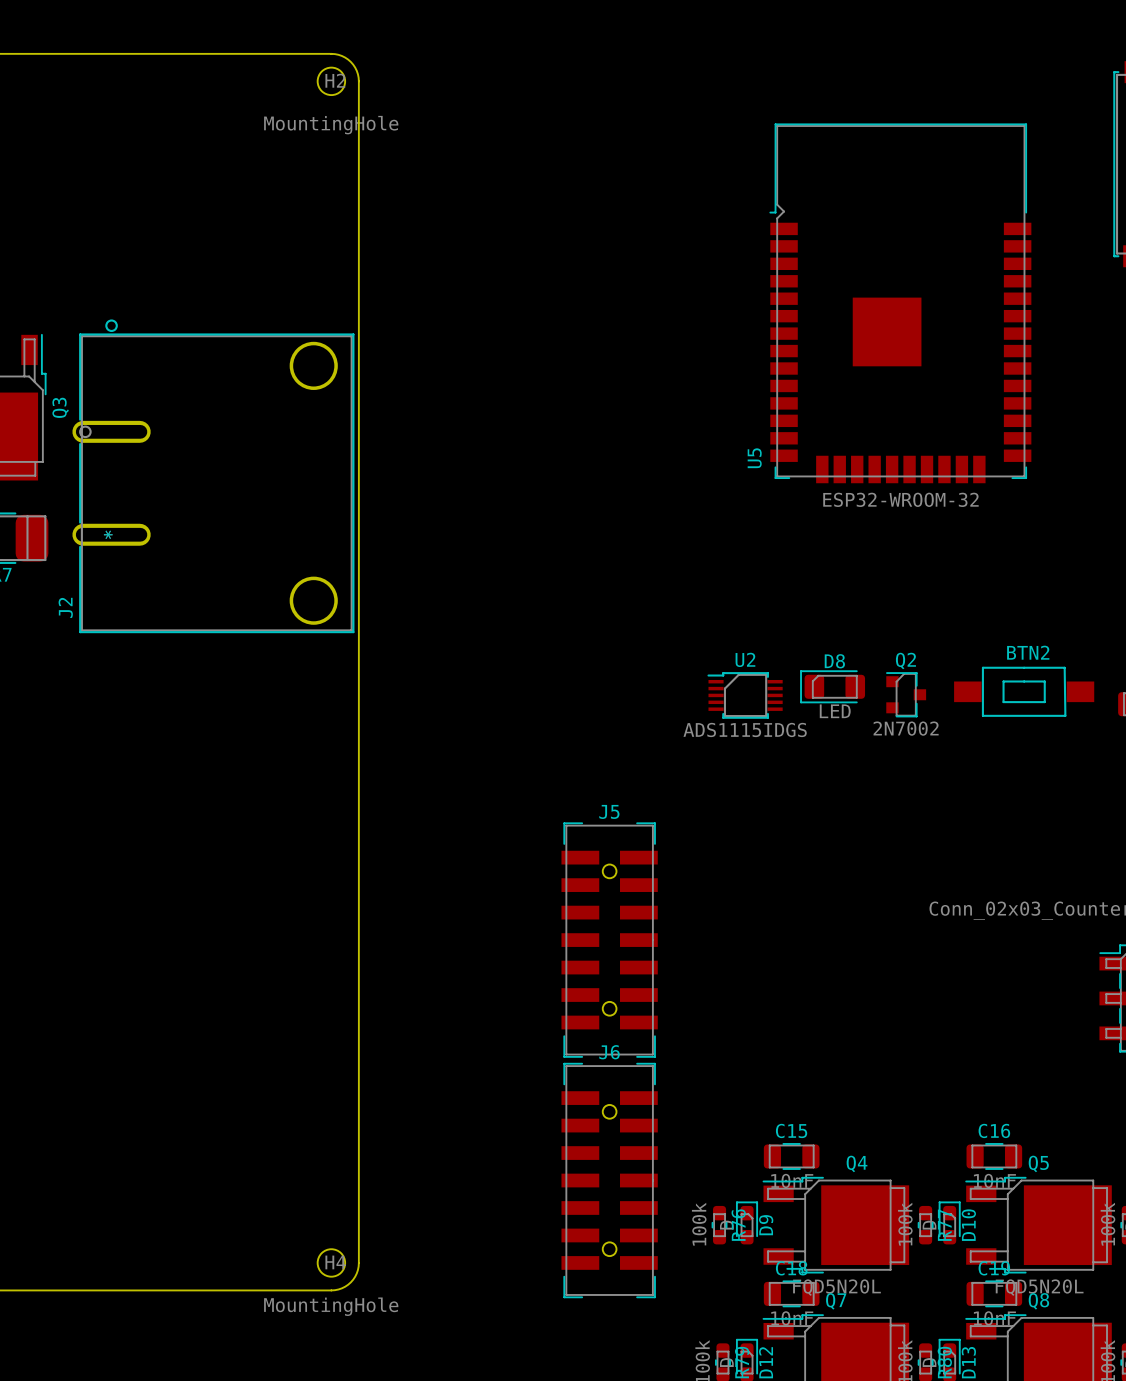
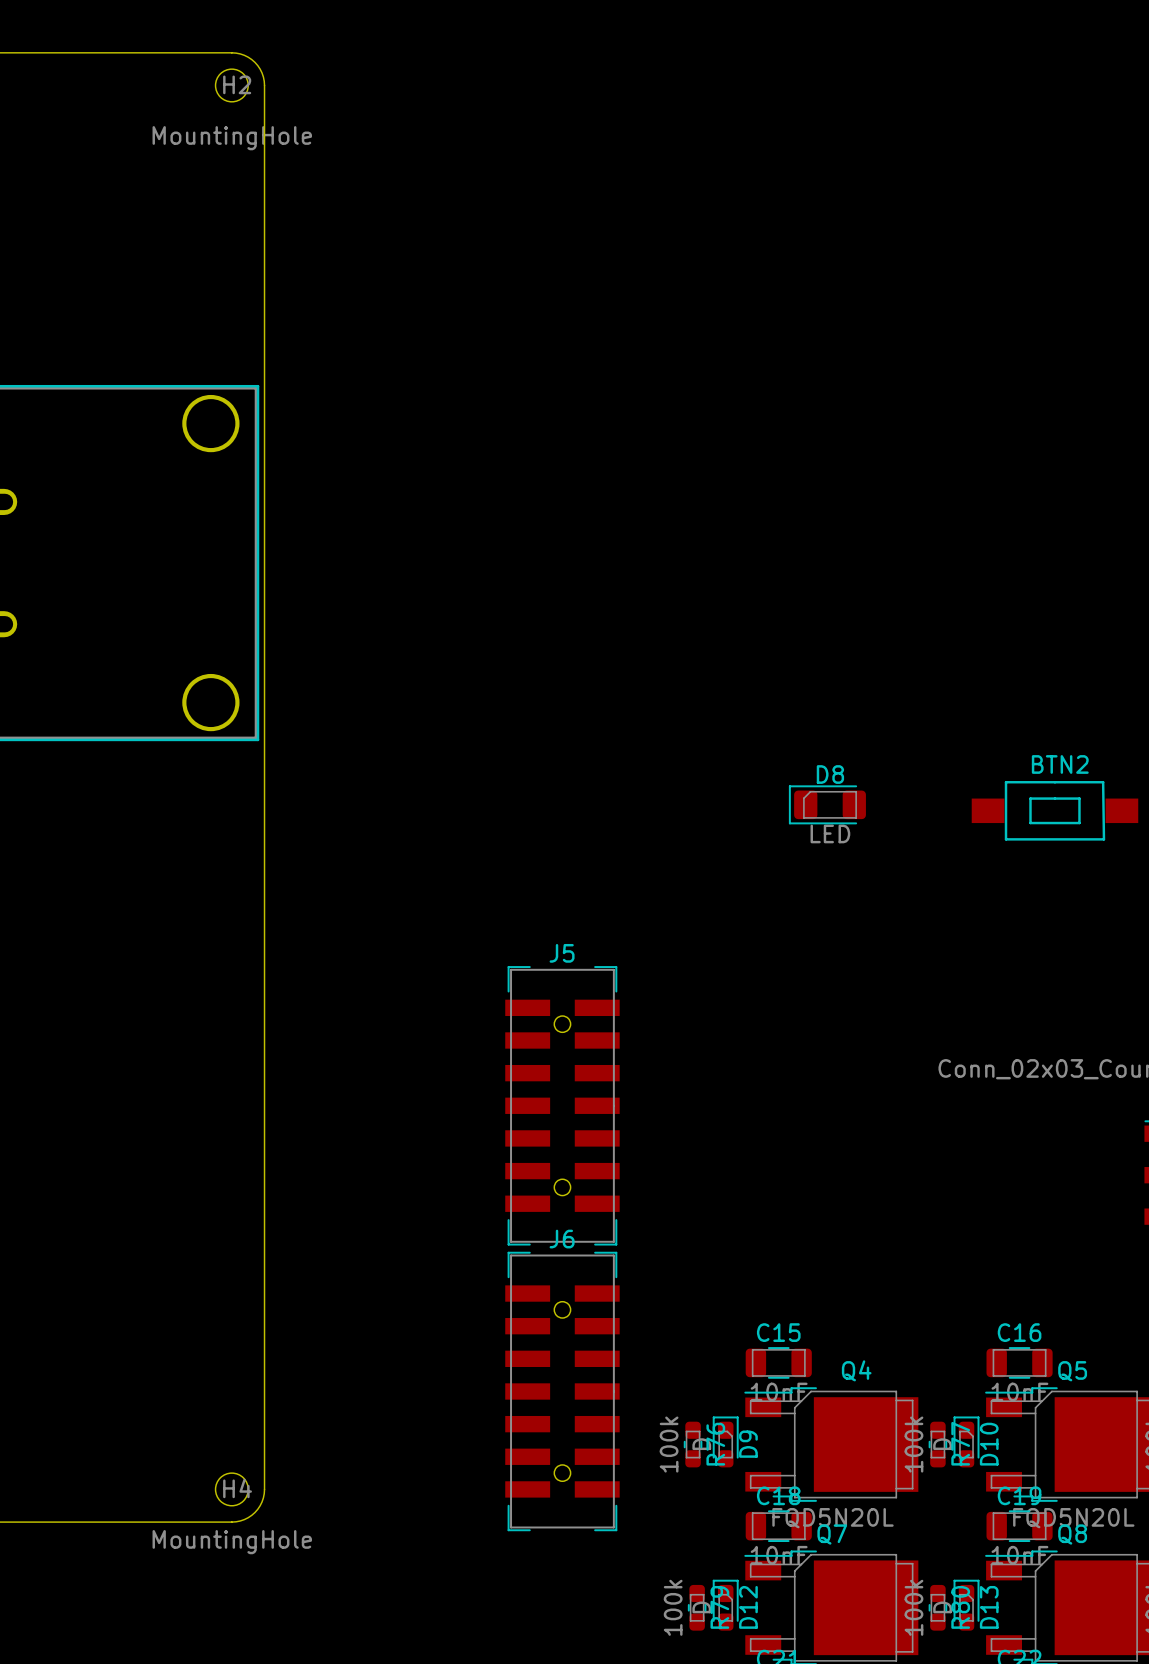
U5: ESP32-WROOM-32 (900, 303) -> none
Q2: 2N7002 (906, 694) -> none
U2: ADS1115IDGS (745, 695) -> none

